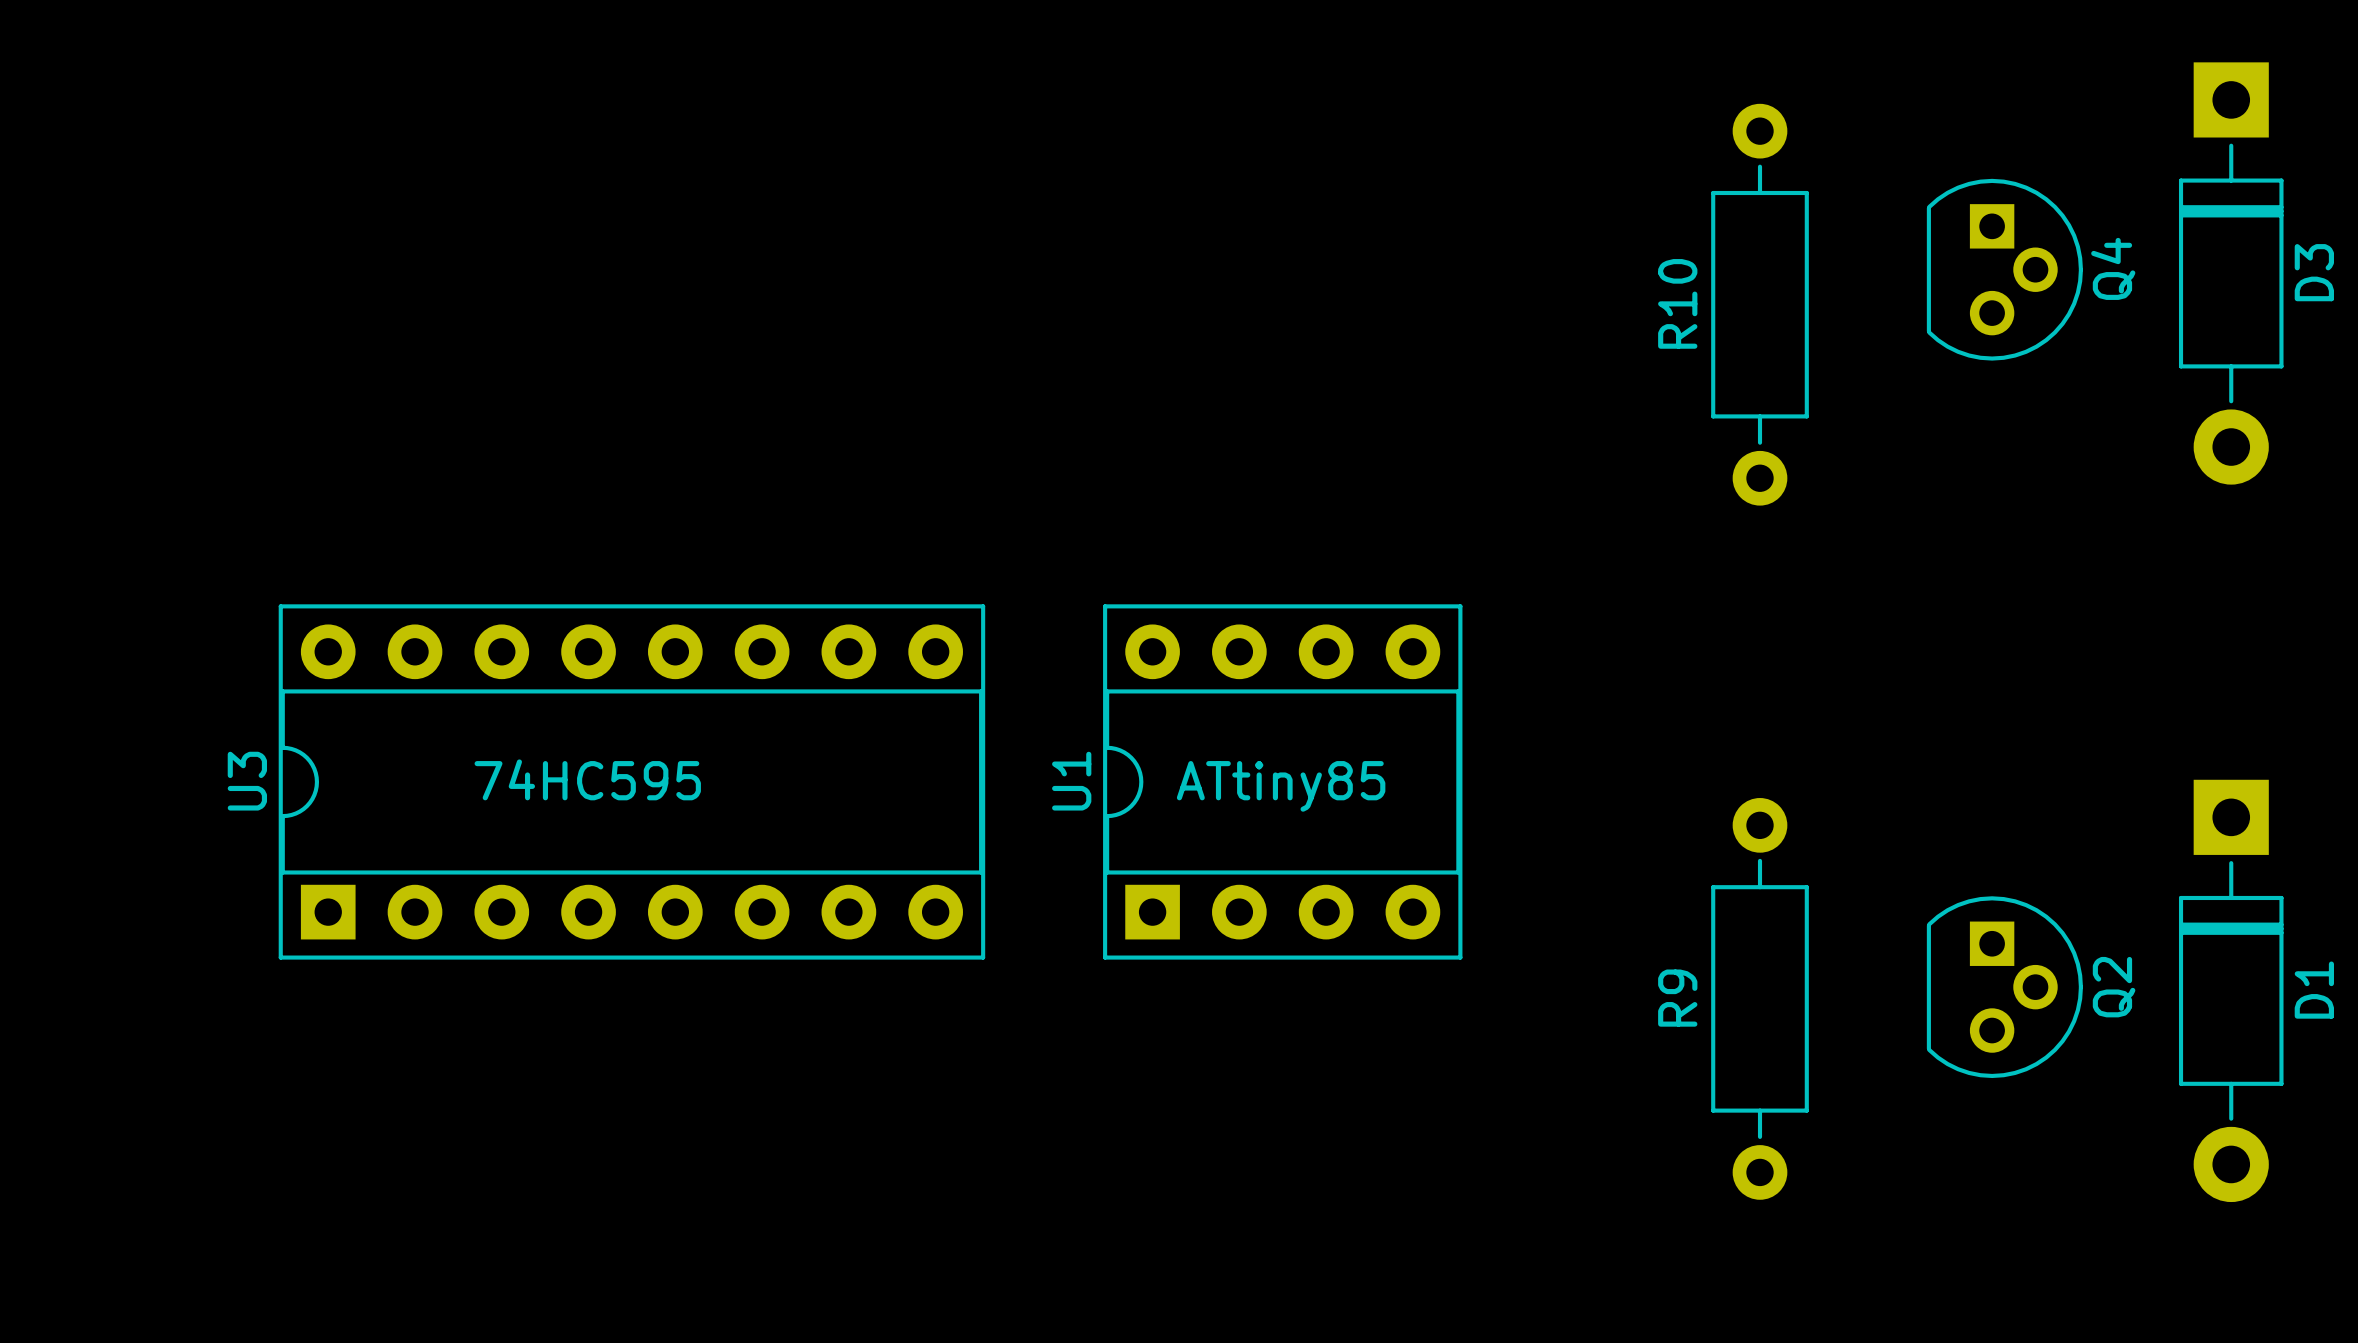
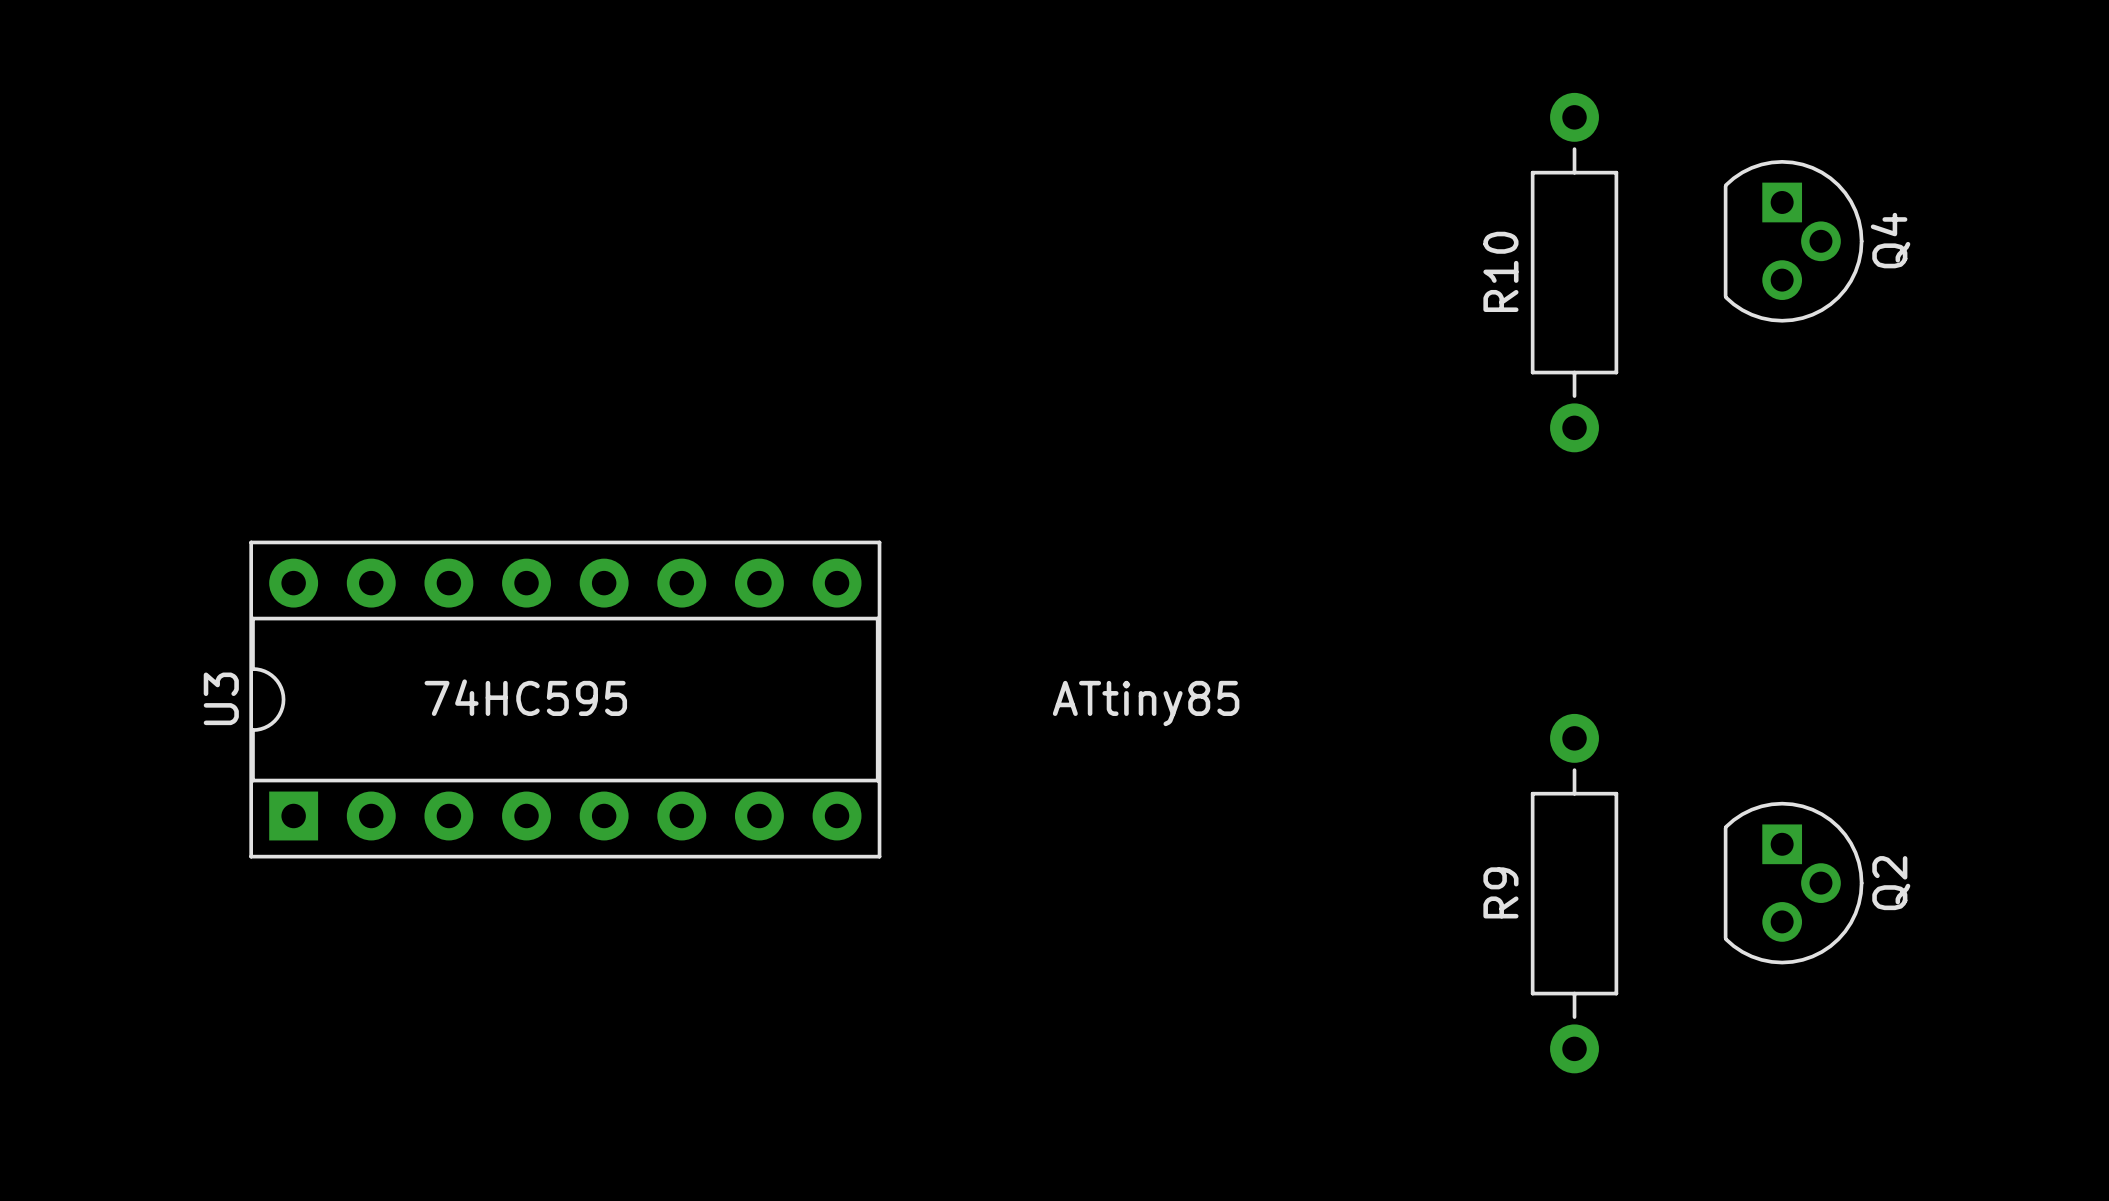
D3: (2231, 273) -> none
U1: (1282, 781) -> none
D1: (2231, 990) -> none

